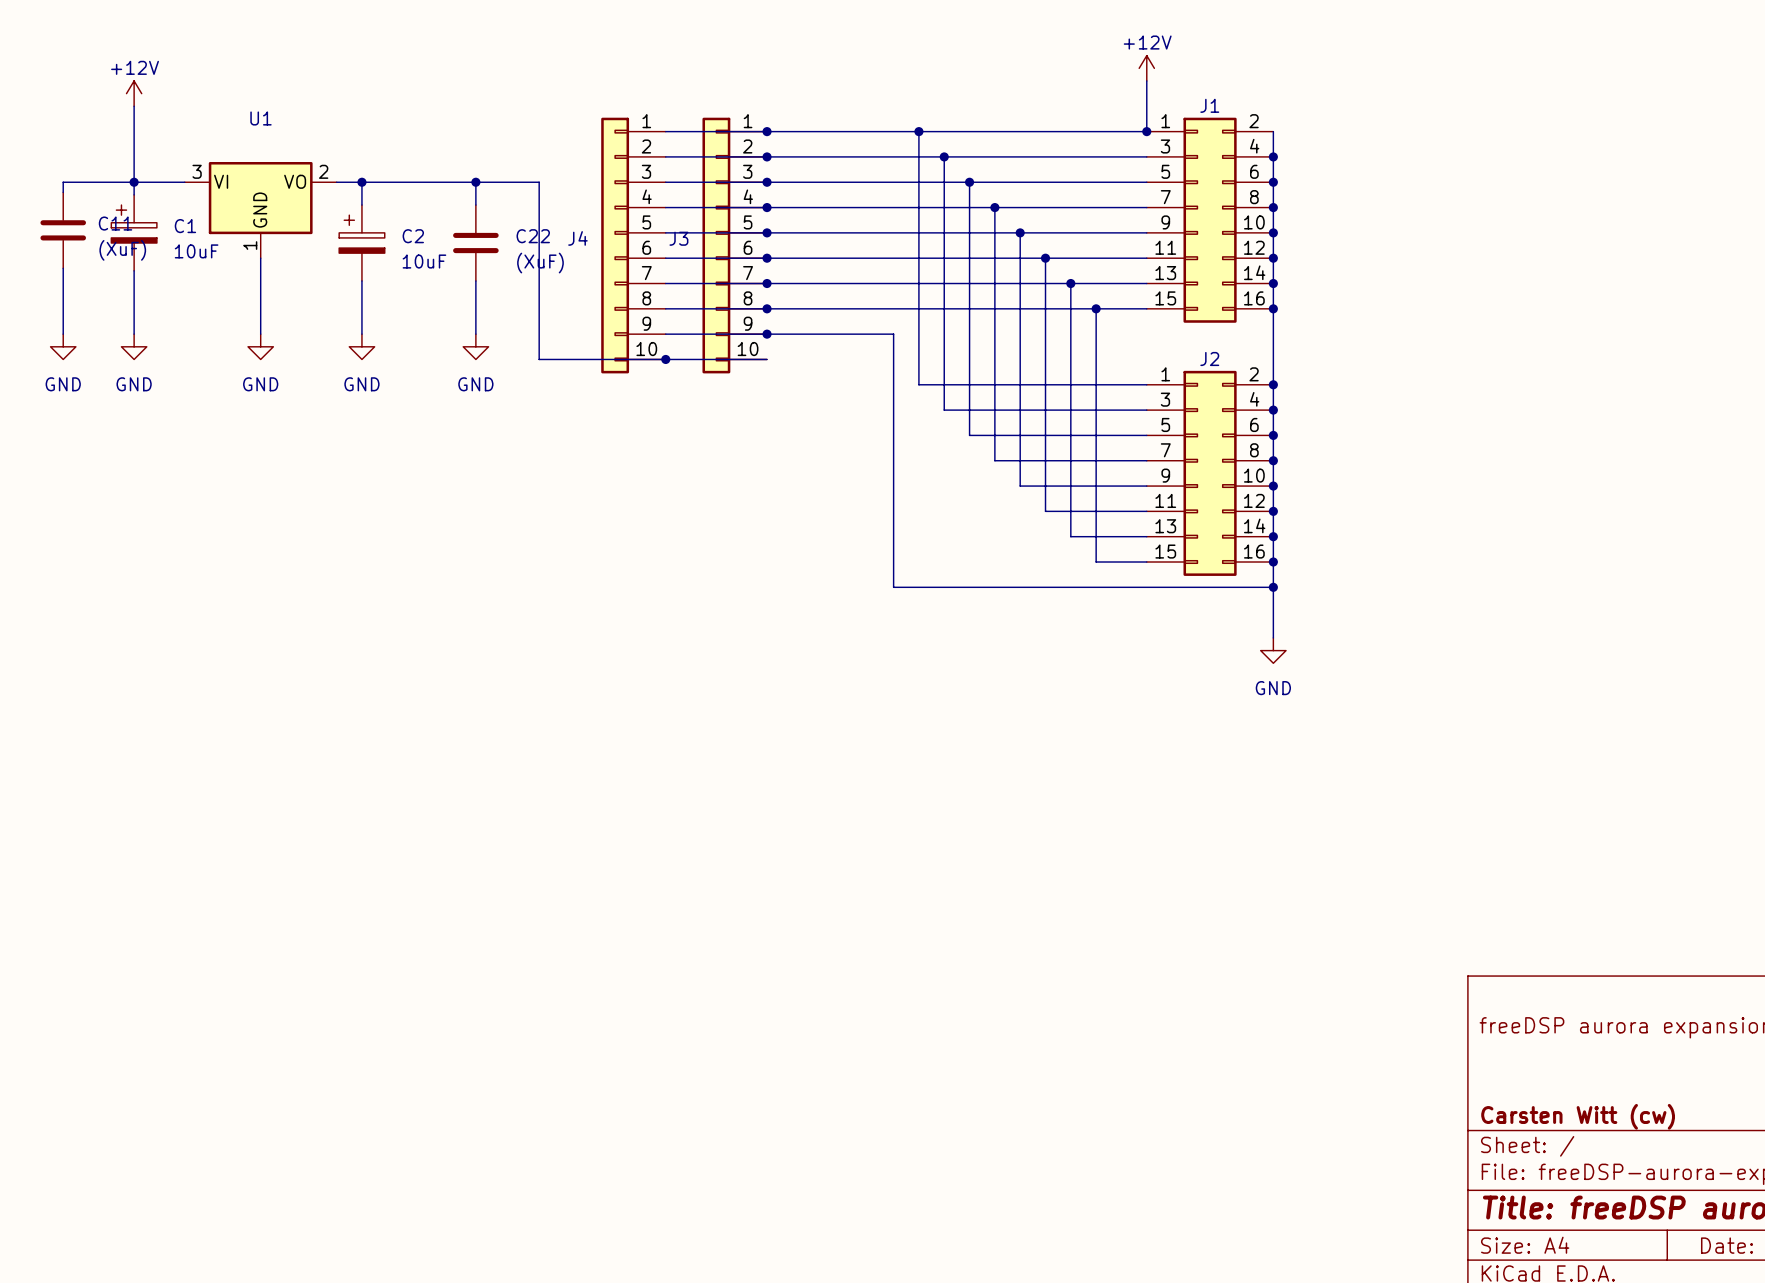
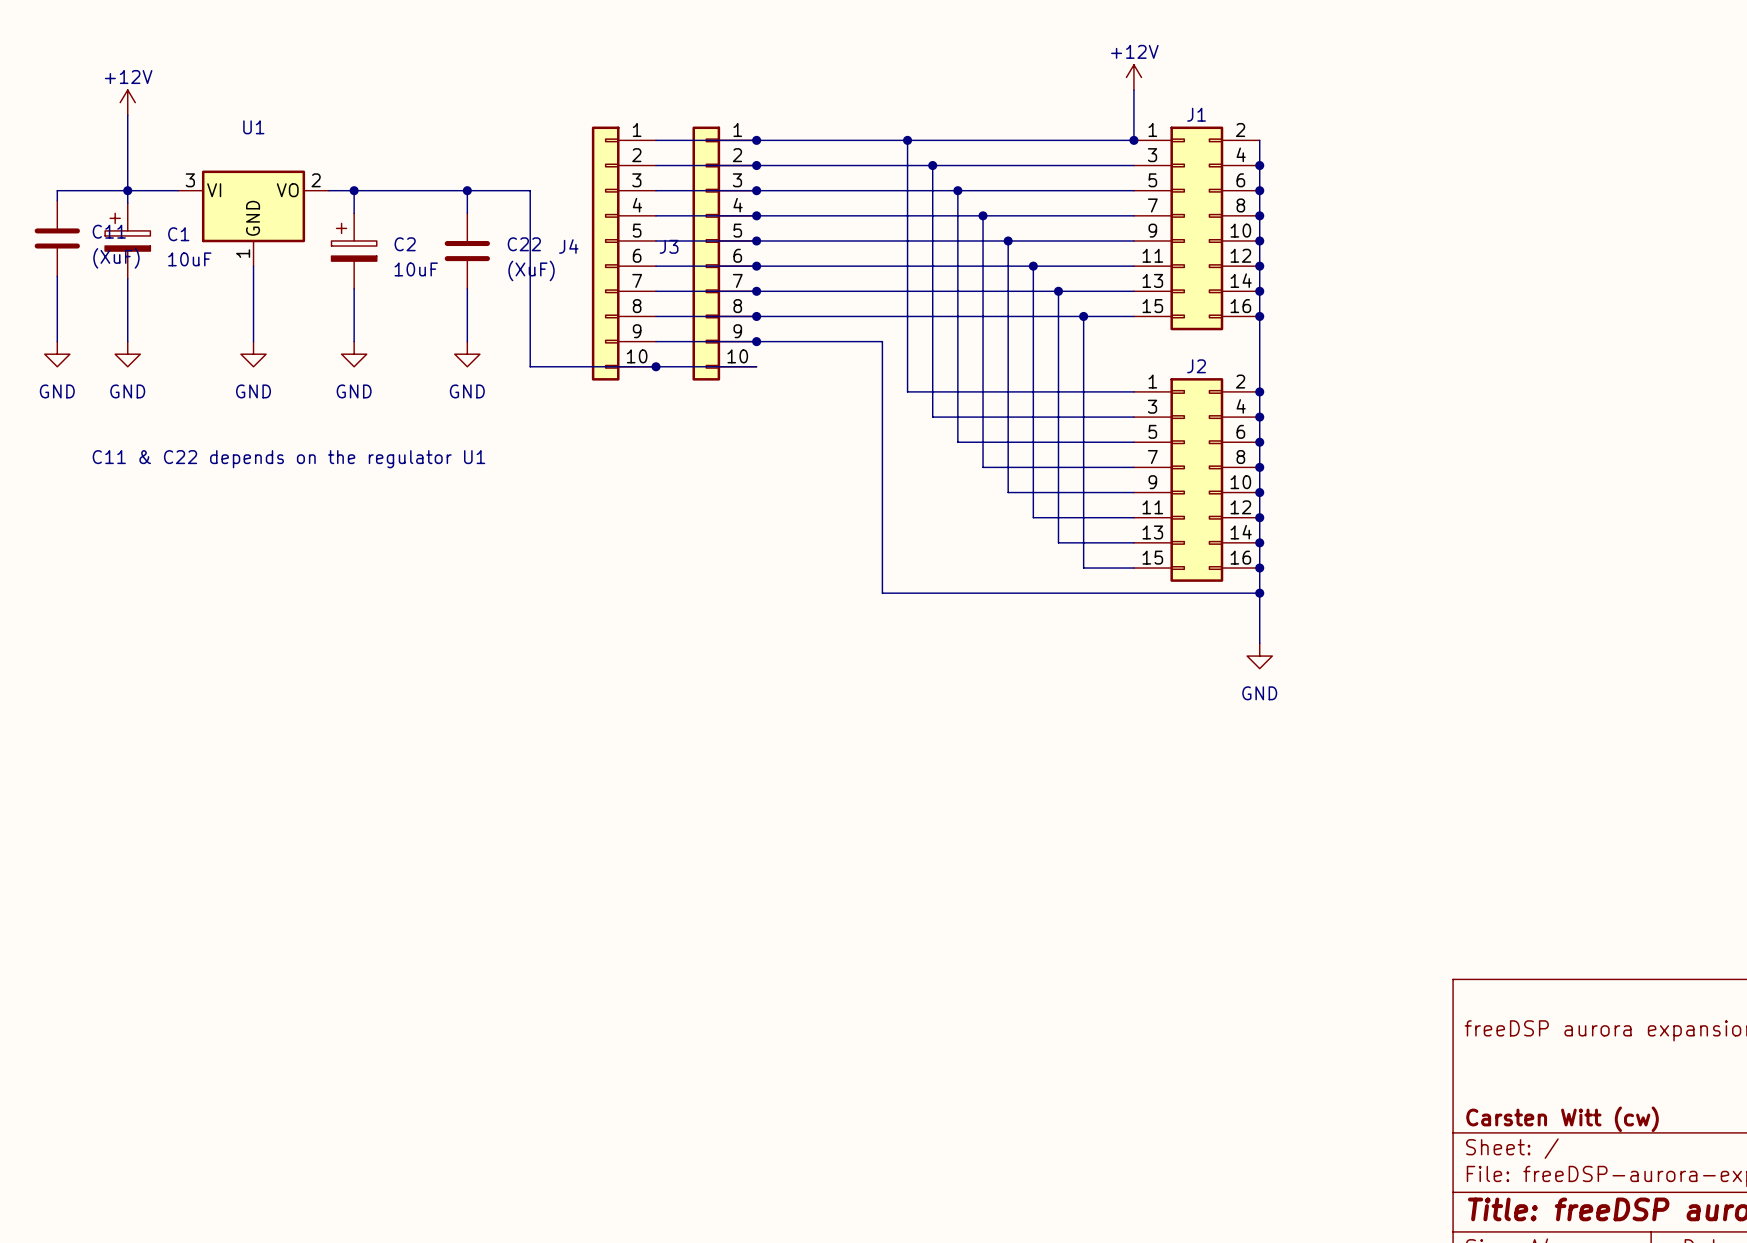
text: none -> C11 & C22 depends on the regulator U1 (288, 459)

